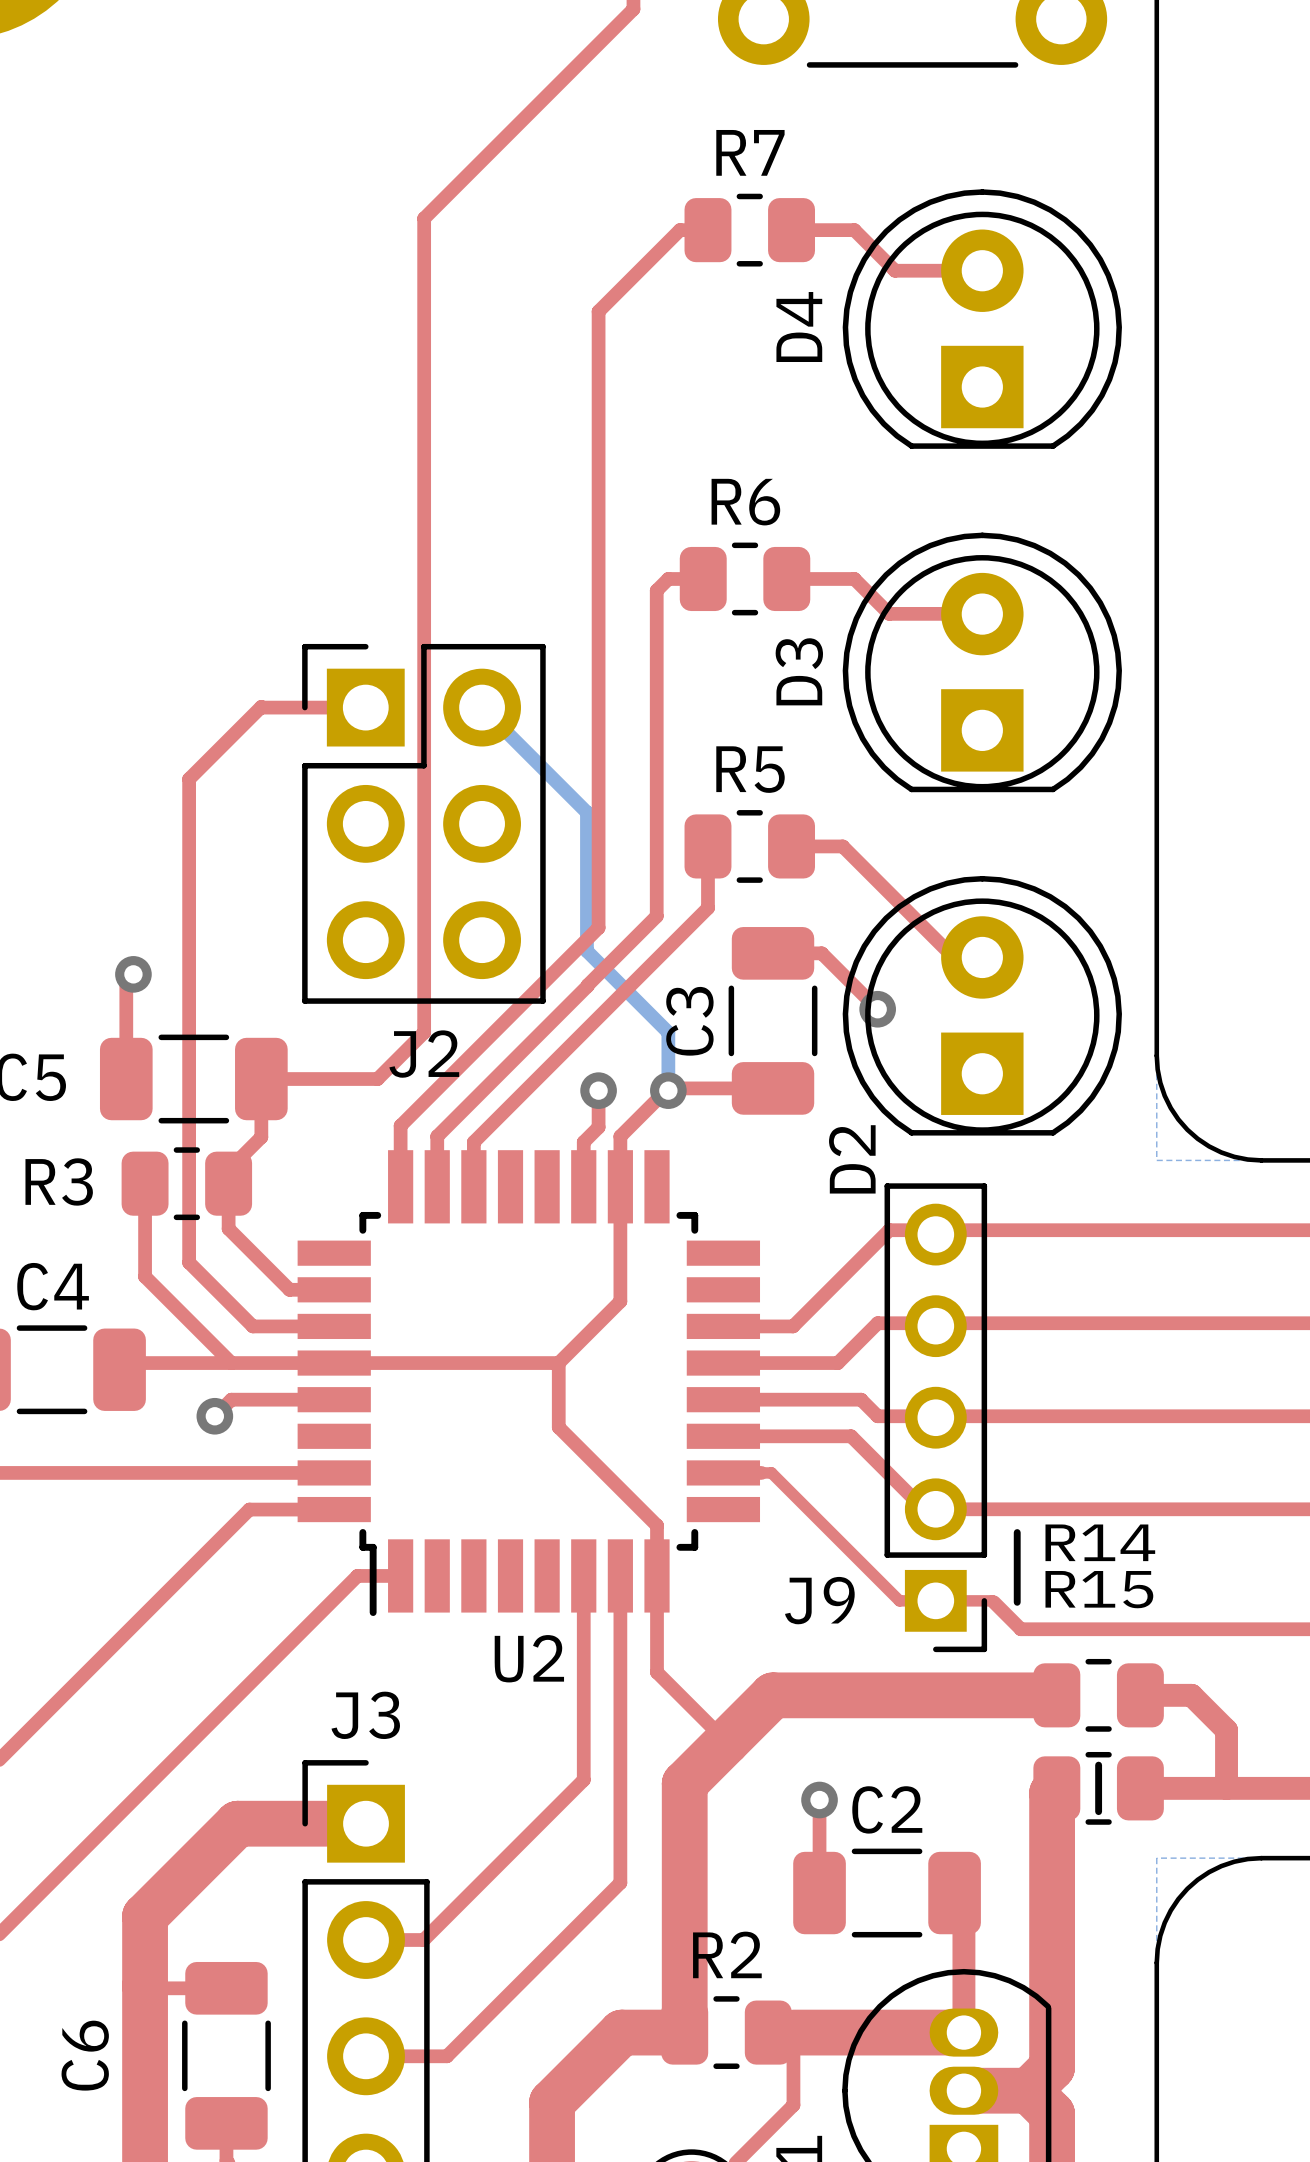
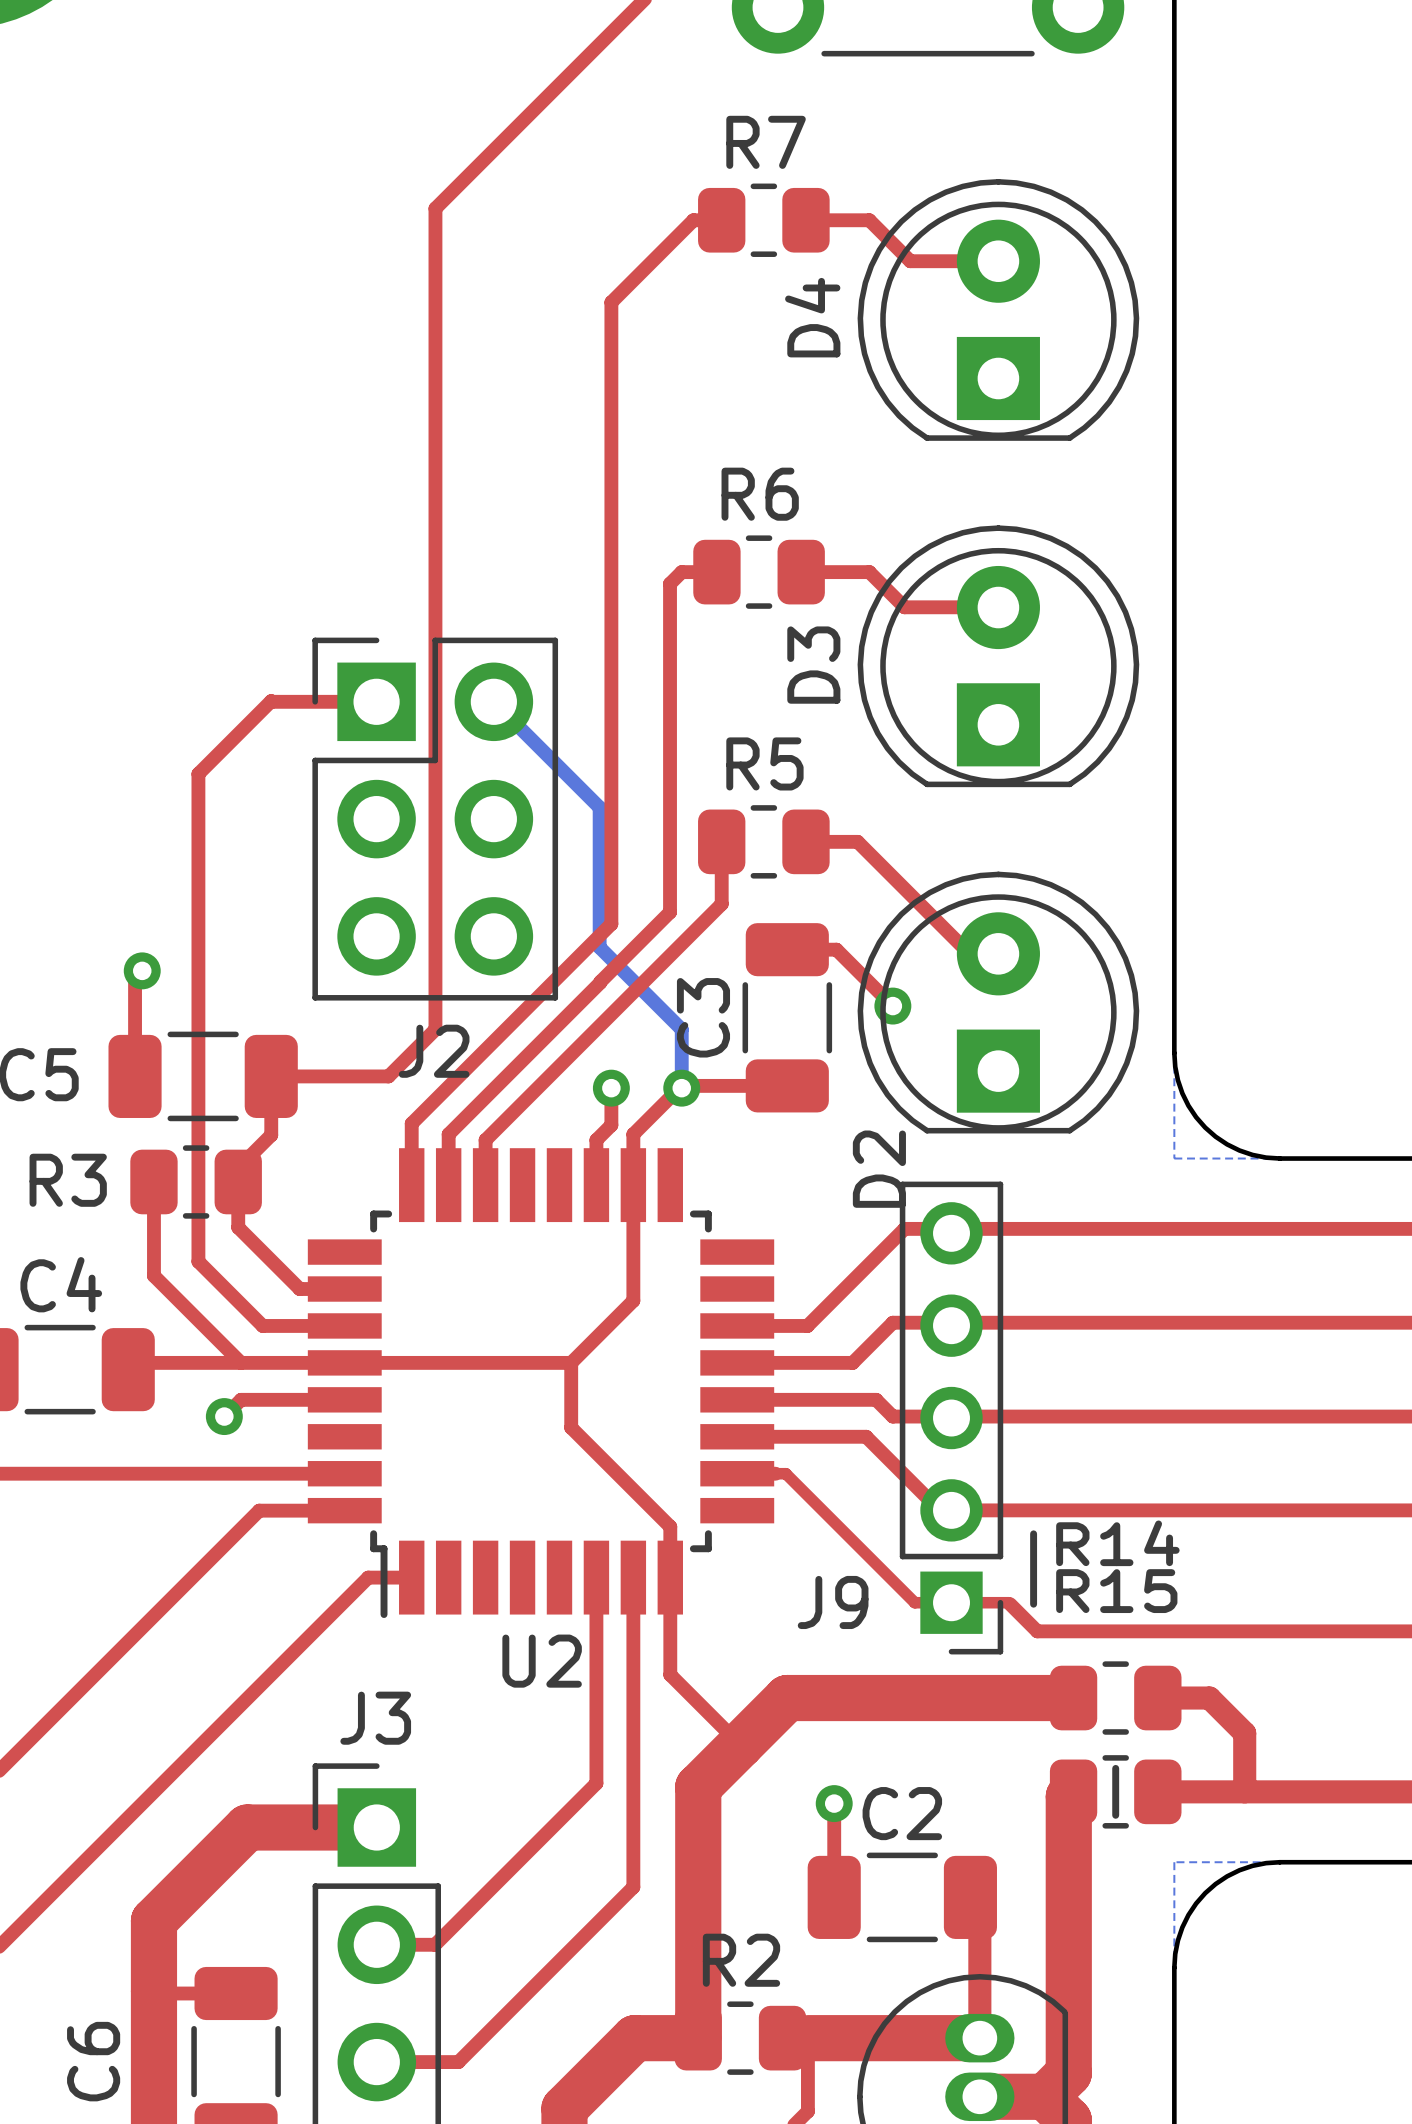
D2 name position: D2 (852, 1159) -> D2 (879, 1169)

